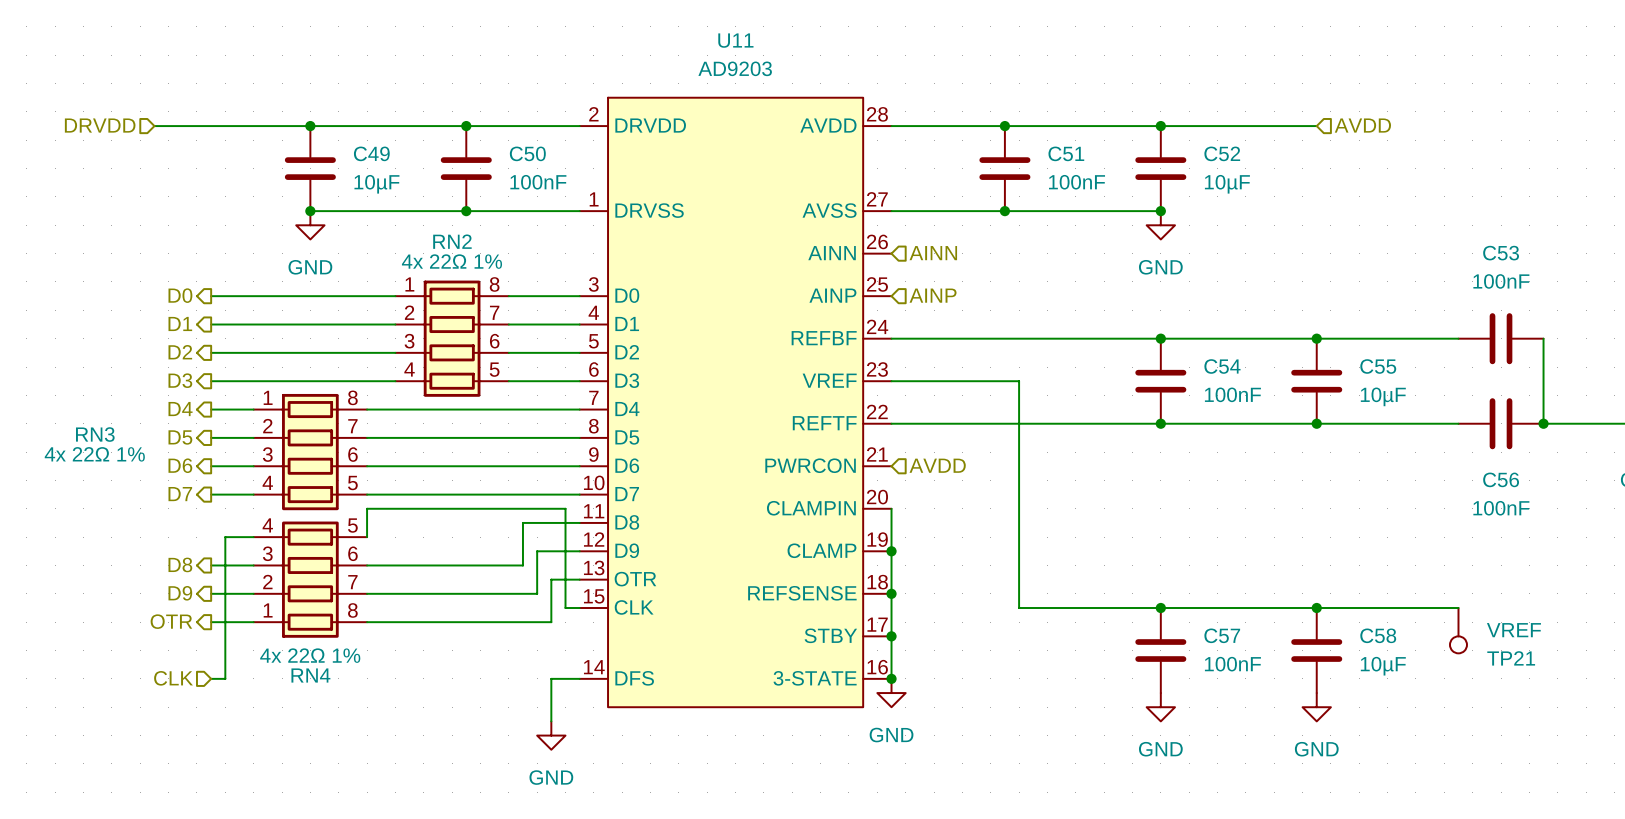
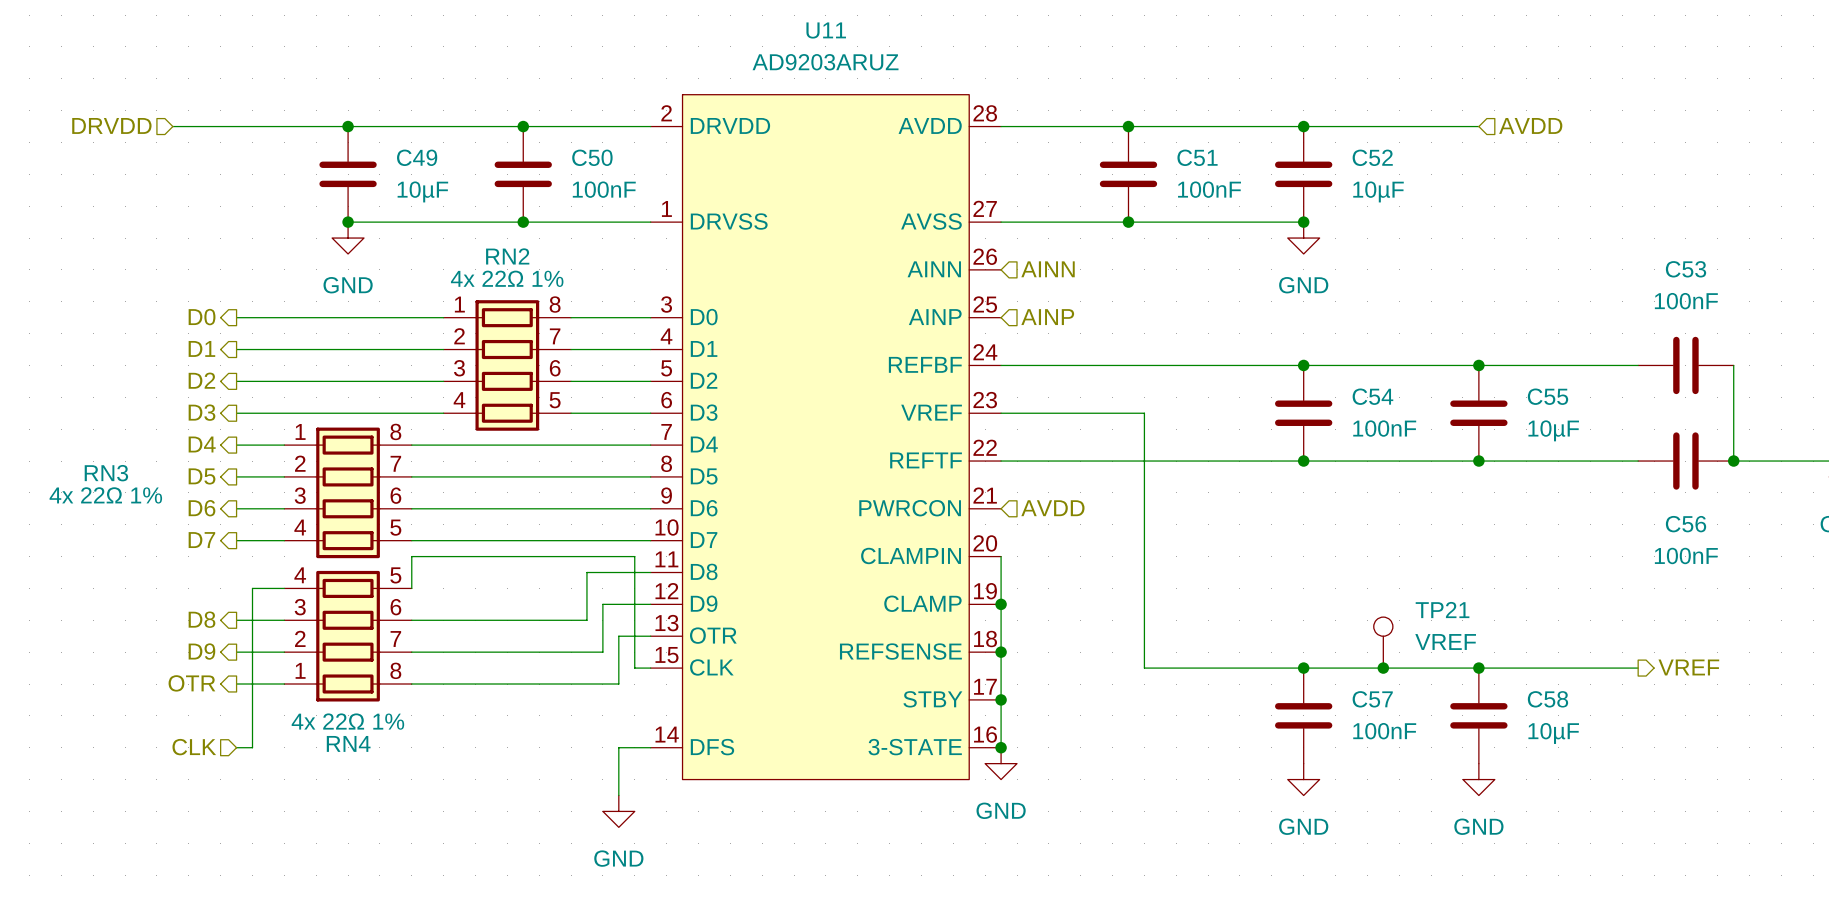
U11 value: AD9203 (735, 68) -> AD9203ARUZ (825, 62)
hierarchical label: none -> VREF (1688, 667)
junction: none -> (1383, 668)
TP21 position: (1458, 630) -> (1383, 642)
TP21 rotation: 0° (1458, 644) -> 180° (1383, 626)
TP21 name position: TP21 (1511, 658) -> TP21 (1442, 610)

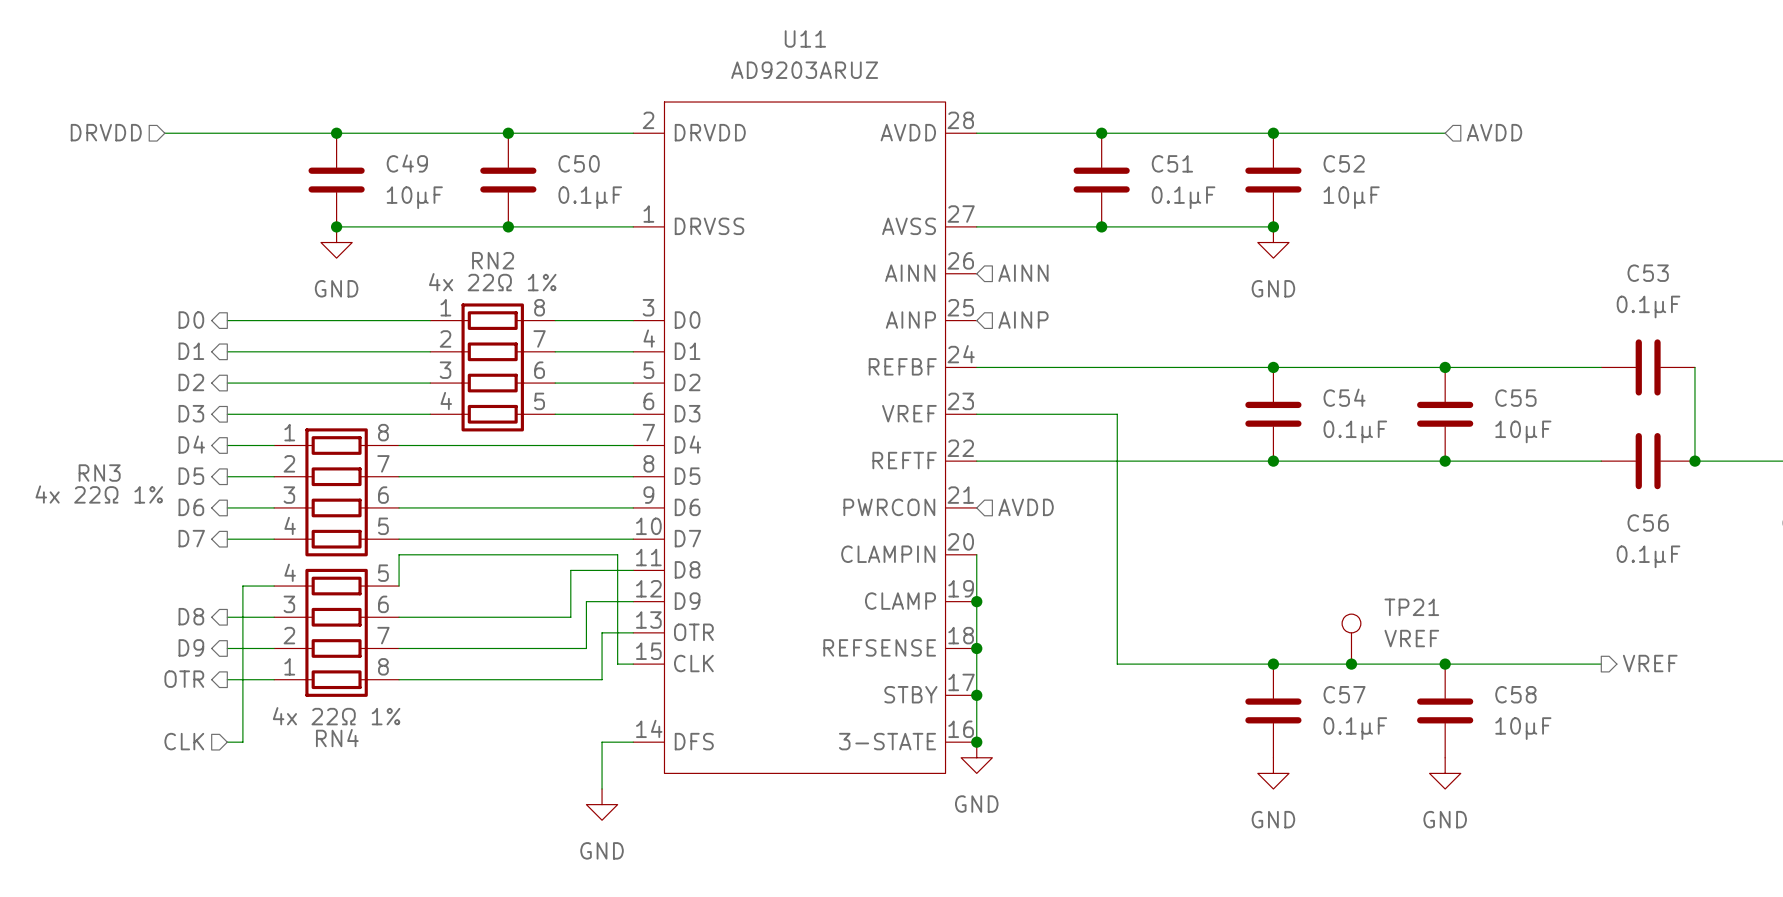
C50 value: 100nF (604, 189) -> 0.1µF (590, 197)
C51 value: 100nF (1209, 189) -> 0.1µF (1183, 197)
C53 value: 100nF (1686, 301) -> 0.1µF (1648, 307)
C54 value: 100nF (1384, 428) -> 0.1µF (1355, 431)
C56 value: 100nF (1686, 555) -> 0.1µF (1648, 556)
C57 value: 100nF (1384, 731) -> 0.1µF (1355, 728)

